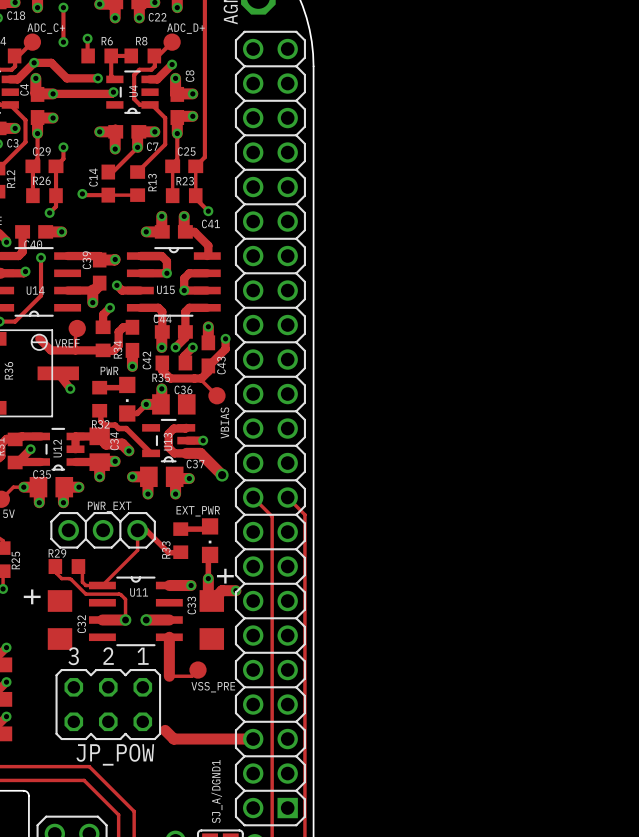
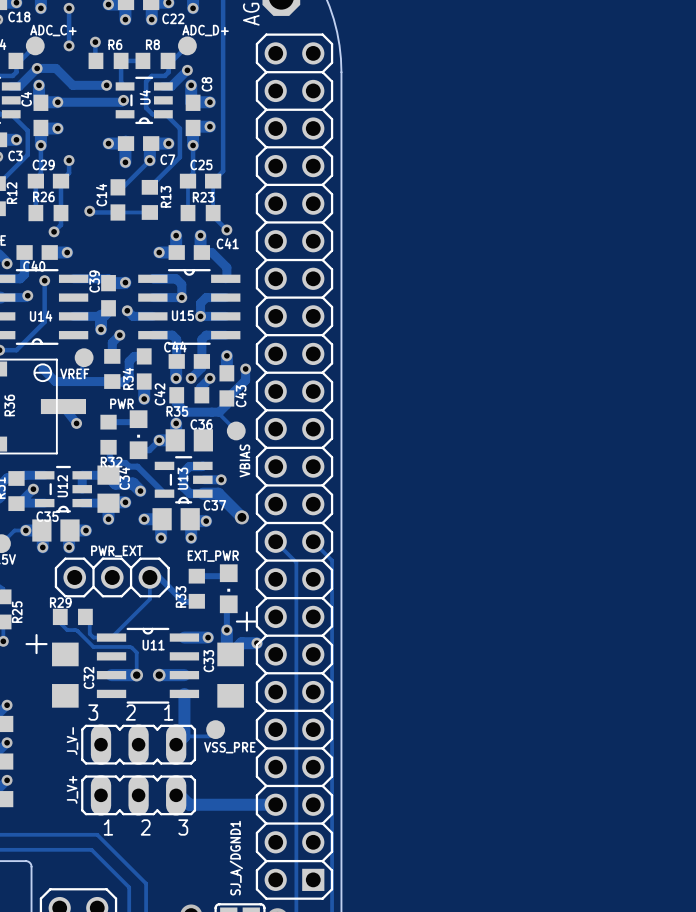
J_V-: none -> (138, 744)
JP_POW: (108, 704) -> none
J_V+: none -> (138, 795)

